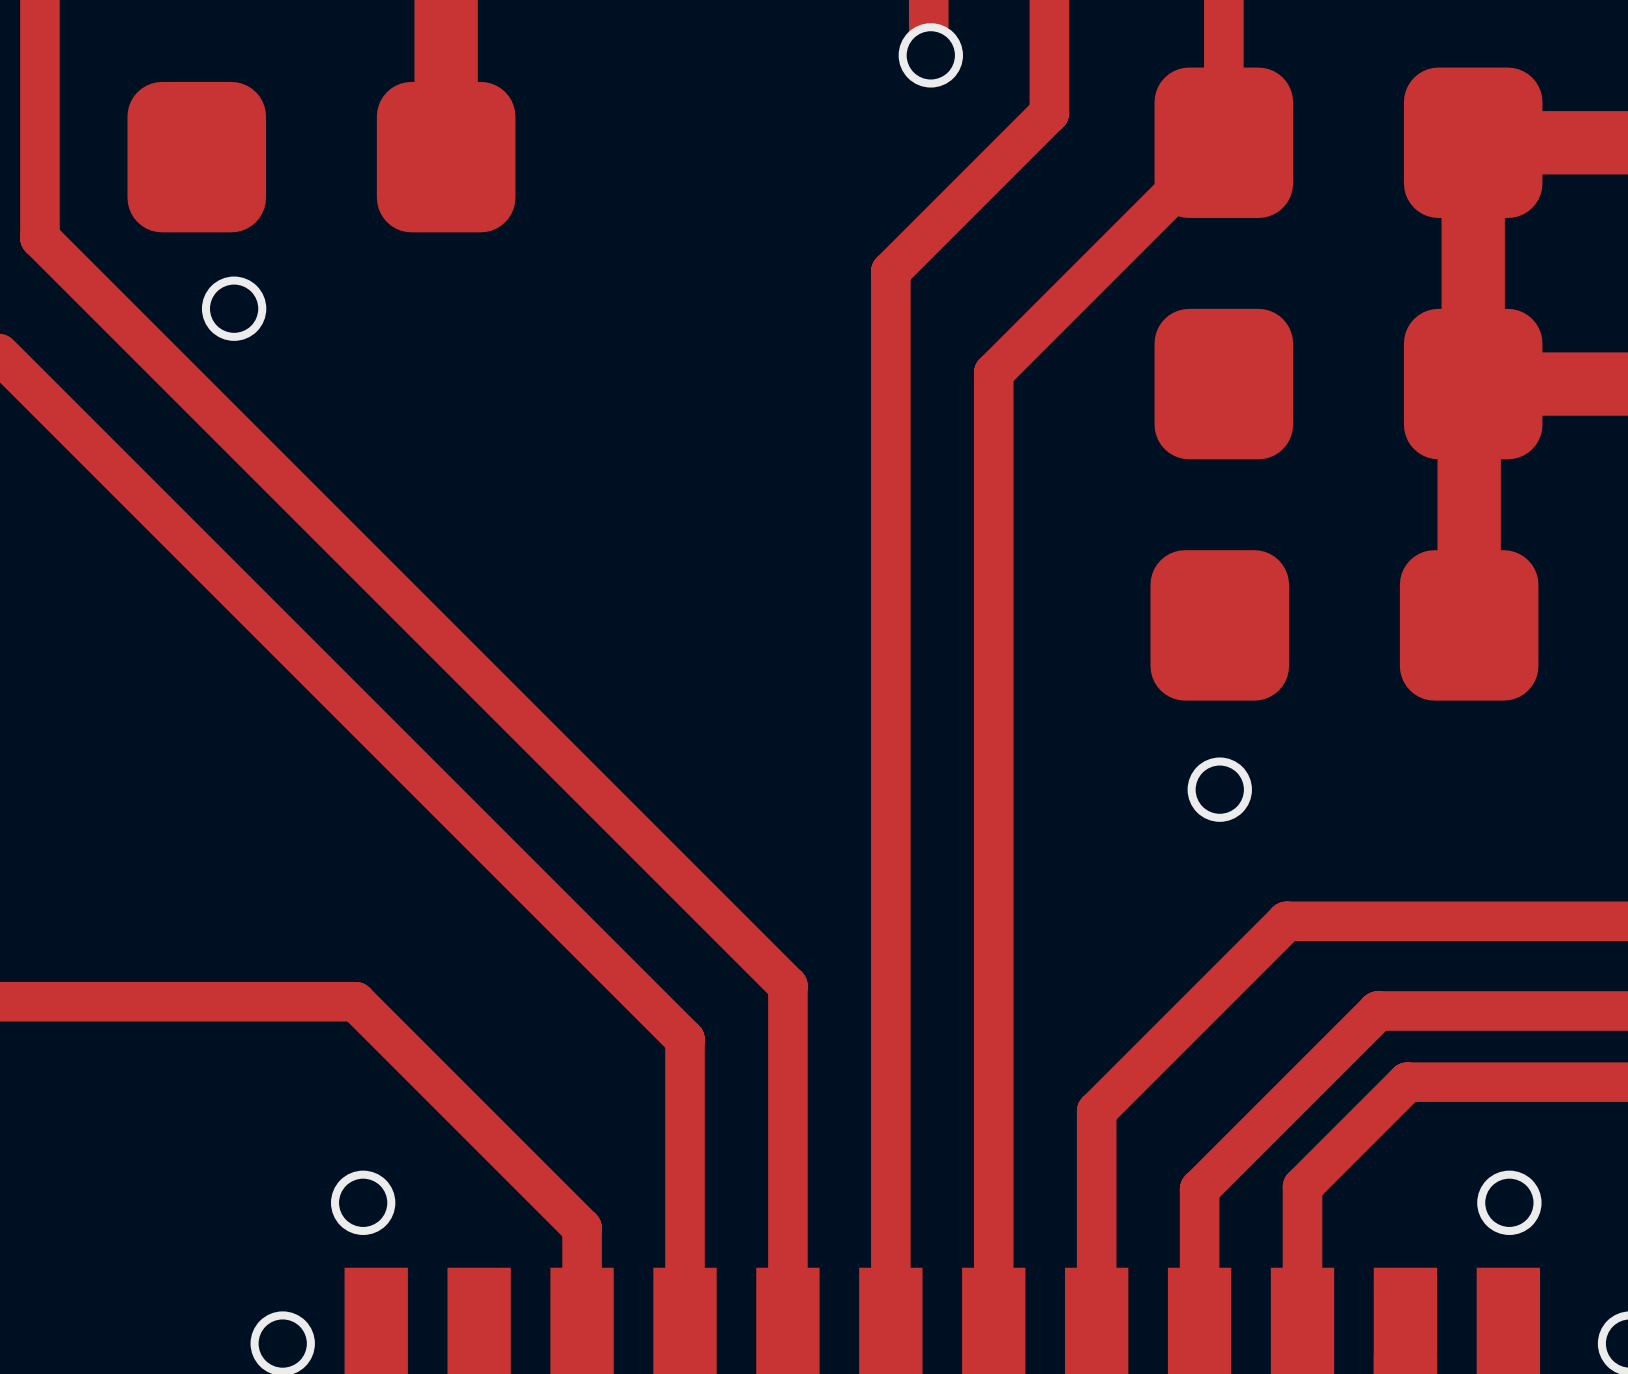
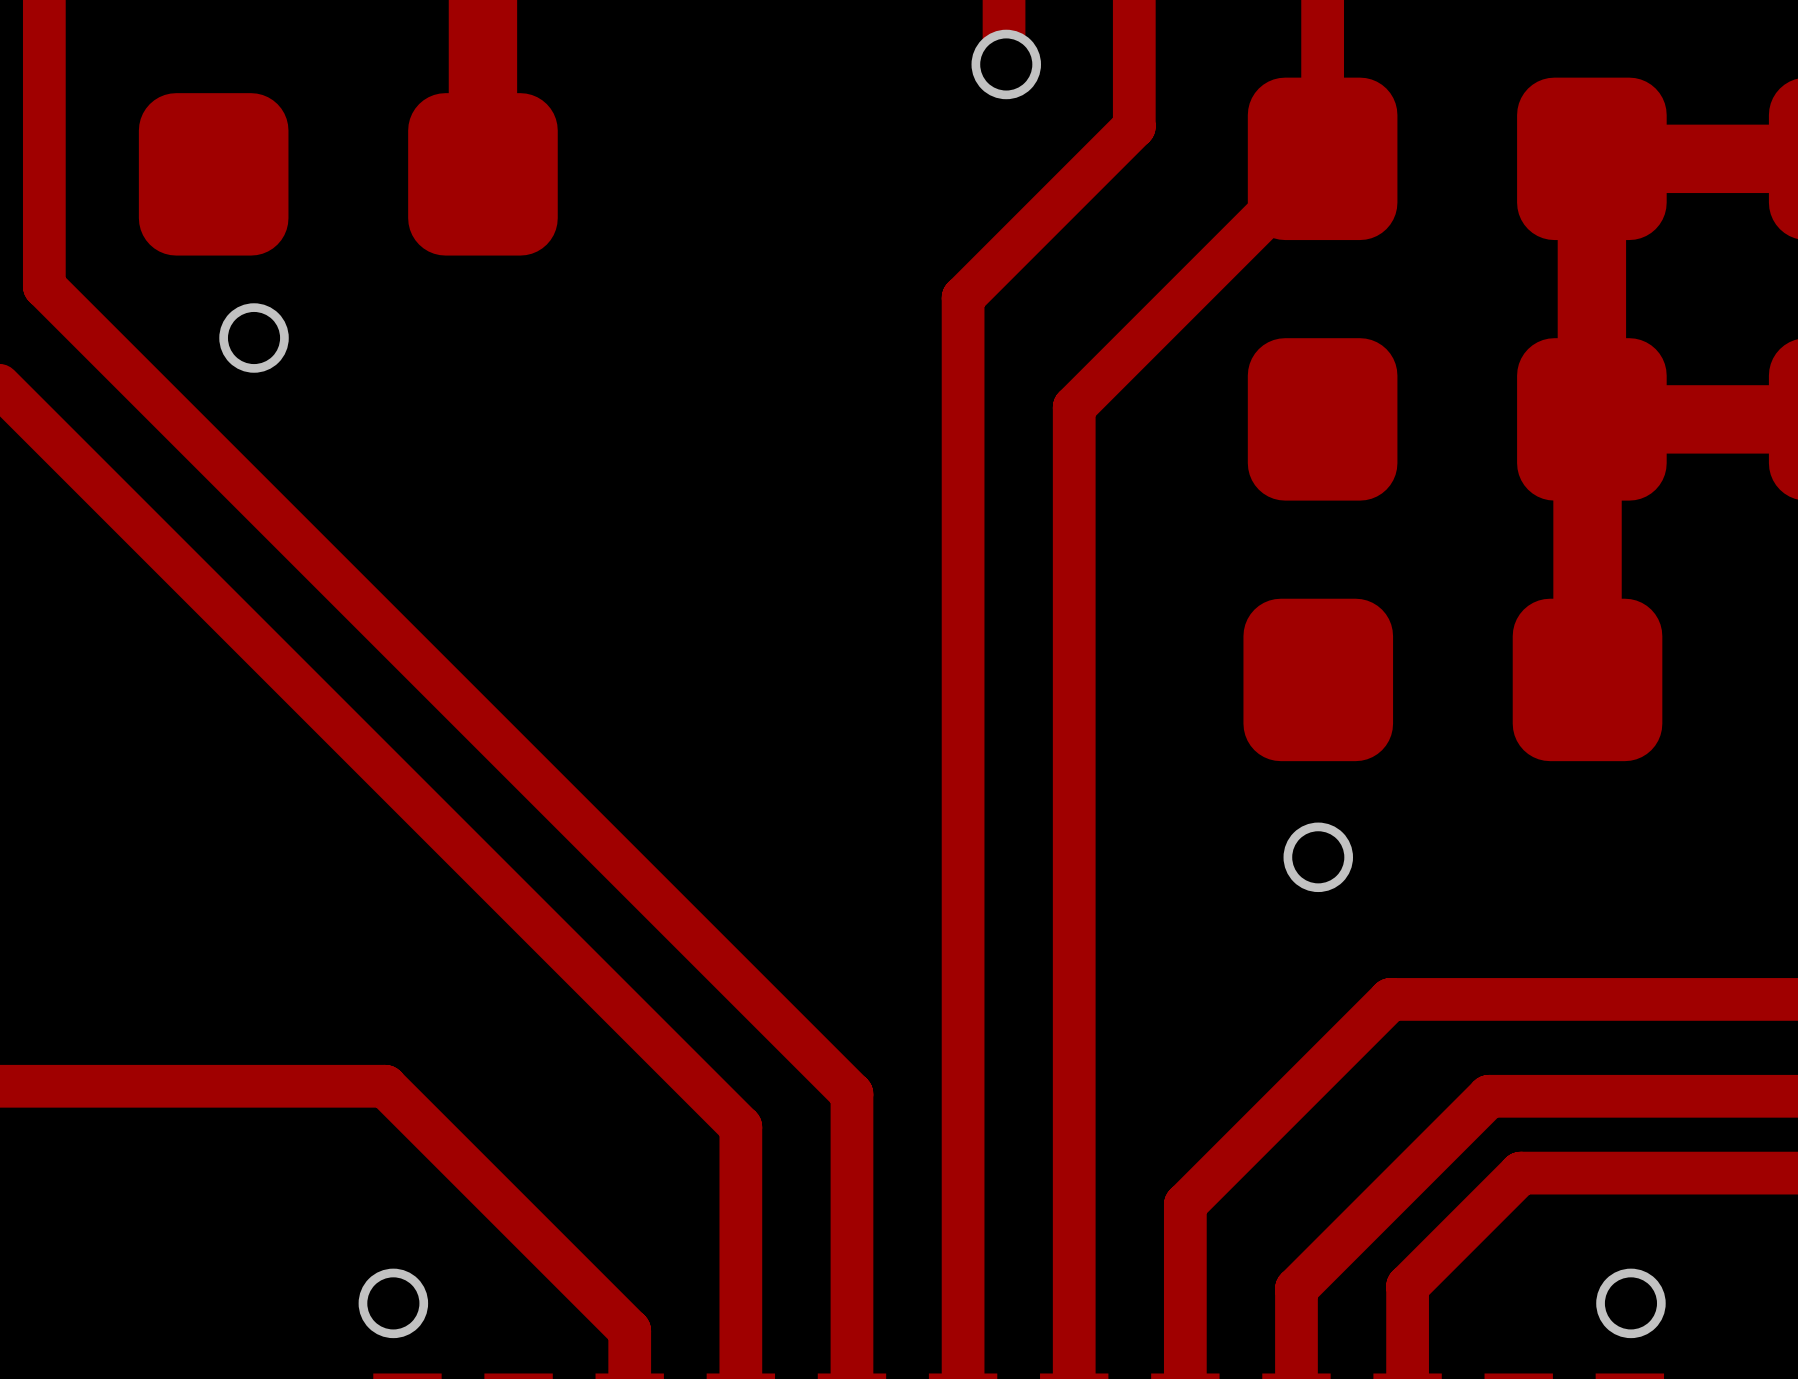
top track: (39, 237) (787, 985) (787, 1008) -> (44, 261) (44, 286) (851, 1094)

